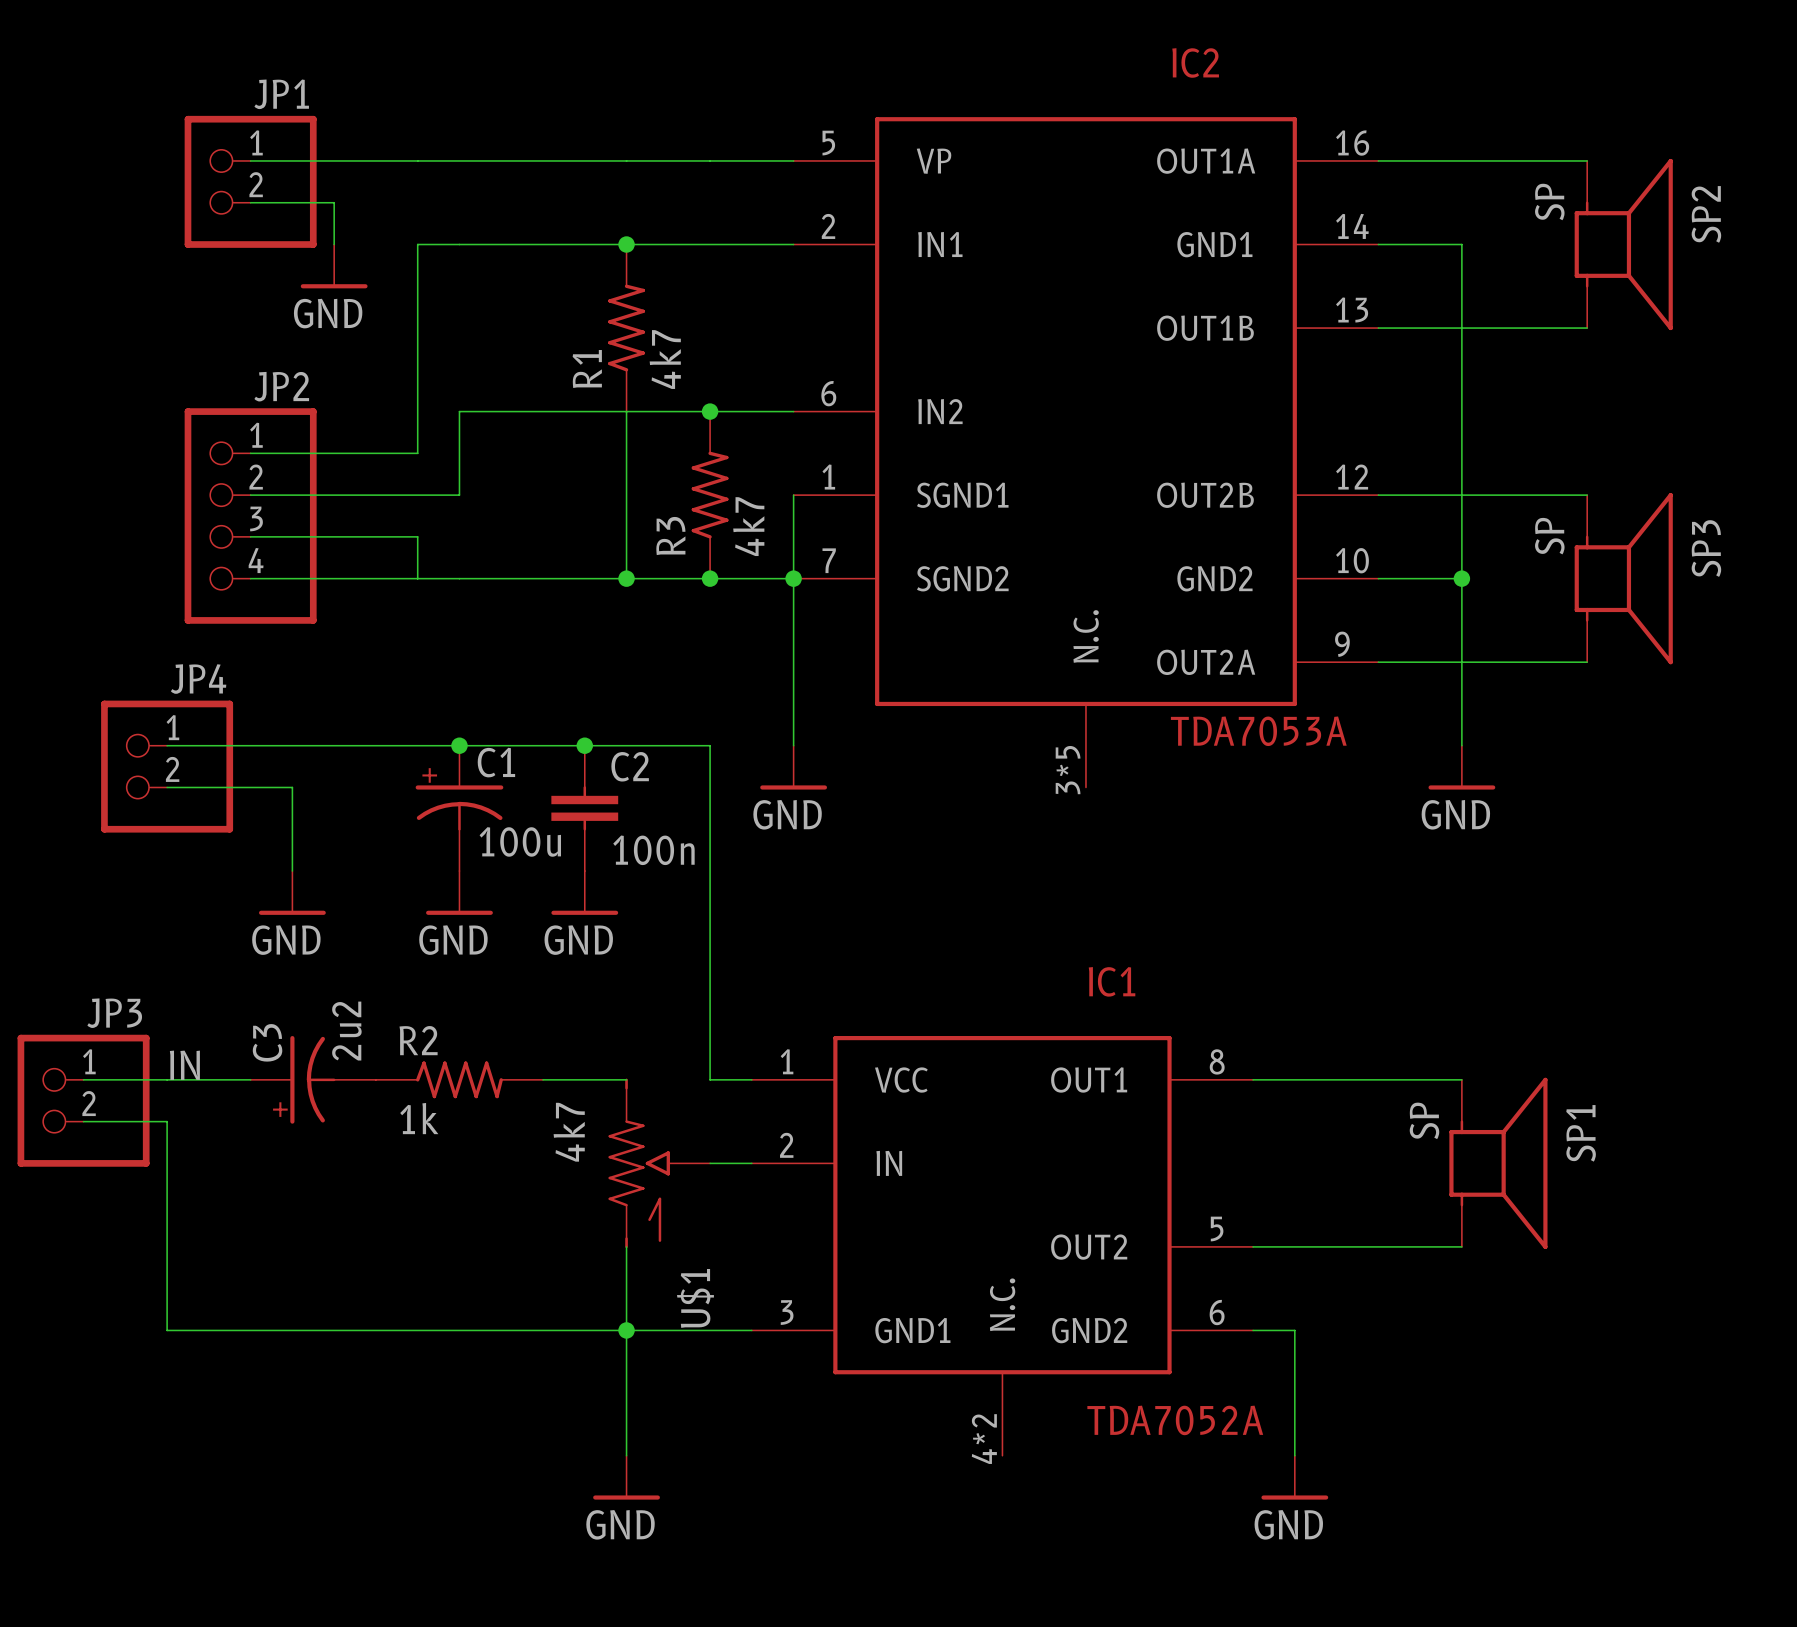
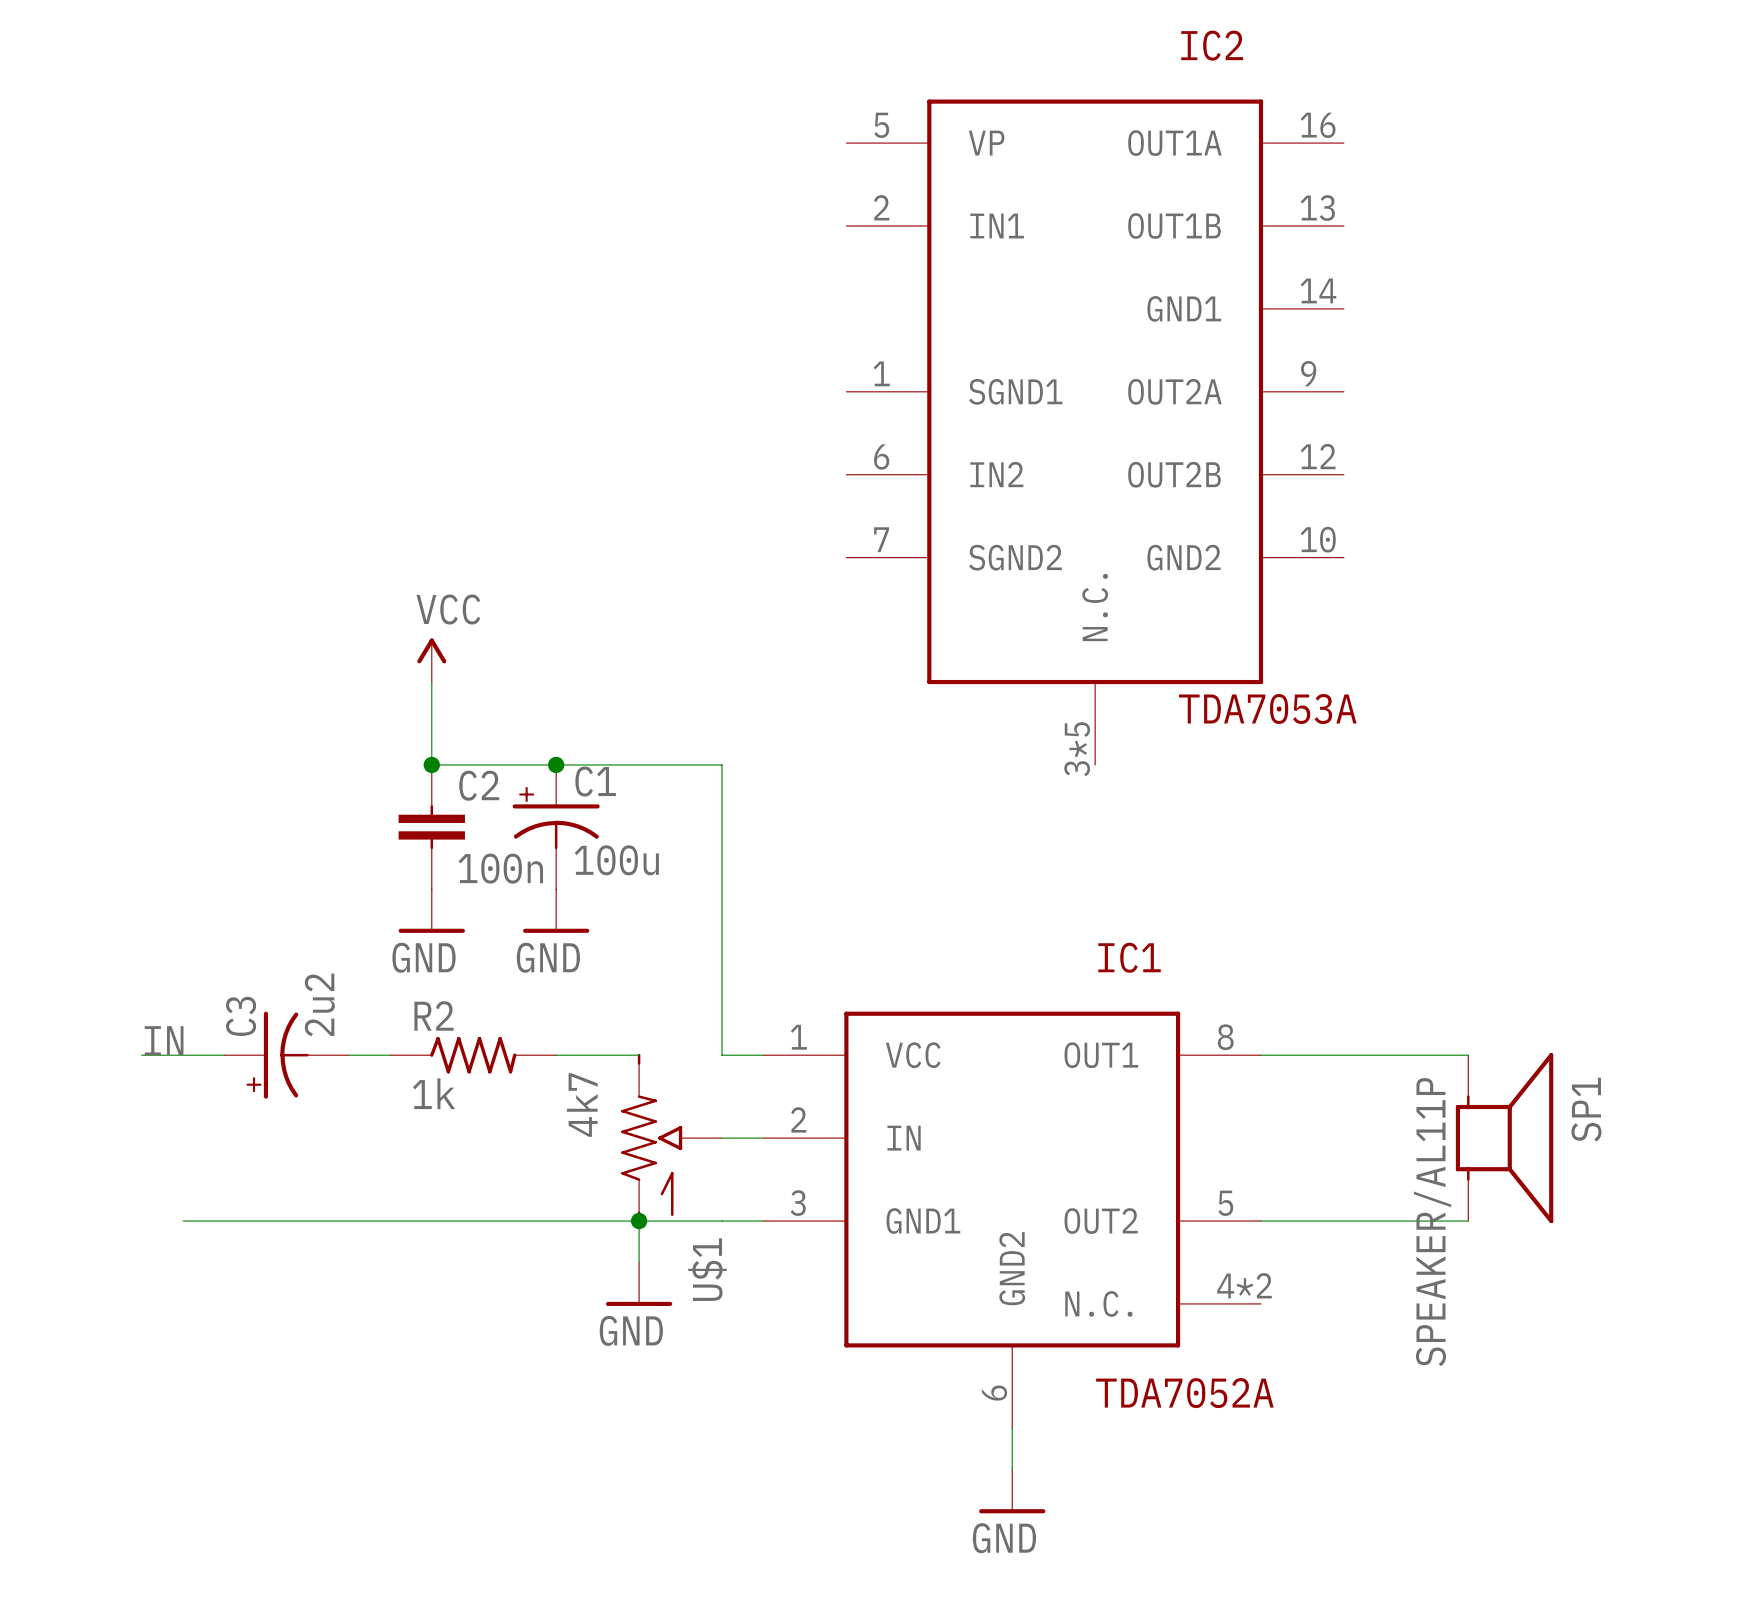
IC2 symbol: [793, 117, 1379, 788] -> [846, 99, 1344, 765]
wire: (250, 160) (793, 160) -> none
wire: (1378, 160) (1587, 160) -> none
JP1: (250, 181) -> none
wire: (250, 202) (334, 202) (334, 244) -> none
junction: (626, 244) -> none
wire: (793, 244) (417, 244) (417, 453) (250, 453) -> none
wire: (1378, 244) (1461, 244) (1461, 745) -> none
SP2: SP (1623, 244) -> none
power symbol: GND (334, 266) -> none
R1: 4k7 (626, 328) -> none
wire: (1378, 328) (1587, 328) -> none
wire: (626, 411) (626, 578) -> none
junction: (710, 411) -> none
wire: (793, 411) (459, 411) (459, 495) (250, 495) -> none
R3: 4k7 (710, 495) -> none
wire: (793, 495) (793, 745) -> none
wire: (1378, 495) (1587, 495) -> none
JP2: (250, 516) -> none
wire: (250, 536) (417, 536) (417, 578) -> none
wire: (250, 578) (793, 578) -> none
junction: (626, 578) -> none
junction: (710, 578) -> none
junction: (793, 578) -> none
wire: (1378, 578) (1461, 578) -> none
junction: (1461, 578) -> none
SP3: SP (1623, 578) -> none
wire: (1378, 662) (1587, 662) -> none
power symbol: none -> VCC (431, 660)
wire: (167, 745) (710, 745) (710, 787) -> (431, 682) (431, 764) (722, 764)
junction: (459, 745) -> none
junction: (584, 745) -> none
JP4: (167, 766) -> none
power symbol: GND (793, 767) -> none
power symbol: GND (1461, 767) -> none
wire: (167, 787) (292, 787) (292, 871) -> none
junction: none -> (431, 764)
junction: none -> (556, 764)
C1 position: (459, 808) -> (556, 827)
C2 position: (584, 808) -> (431, 827)
power symbol: GND (292, 892) -> none
power symbol: GND (459, 892) -> none
power symbol: GND (584, 892) -> none
power symbol: none -> GND (431, 911)
power symbol: none -> GND (556, 911)
IC1 symbol: [751, 1036, 1254, 1456] -> [763, 1011, 1261, 1429]
label position: IN (184, 1065) -> IN (164, 1040)
wire: (83, 1079) (125, 1079) -> none
C3 position: (313, 1079) -> (286, 1055)
JP3: (83, 1100) -> none
SP1 value: SP (1424, 1120) -> SPEAKER/AL11P (1432, 1222)
wire: (83, 1121) (167, 1121) (167, 1330) (751, 1330) -> none
wire: none -> (183, 1221) (763, 1221)
wire: (626, 1288) (626, 1455) -> none
junction position: (626, 1330) -> (639, 1221)
wire: (1253, 1330) (1294, 1330) (1294, 1455) -> none
wire: none -> (1012, 1428) (1012, 1469)
power symbol position: GND (626, 1477) -> GND (639, 1284)
power symbol: GND (1294, 1477) -> none
power symbol: none -> GND (1012, 1491)

